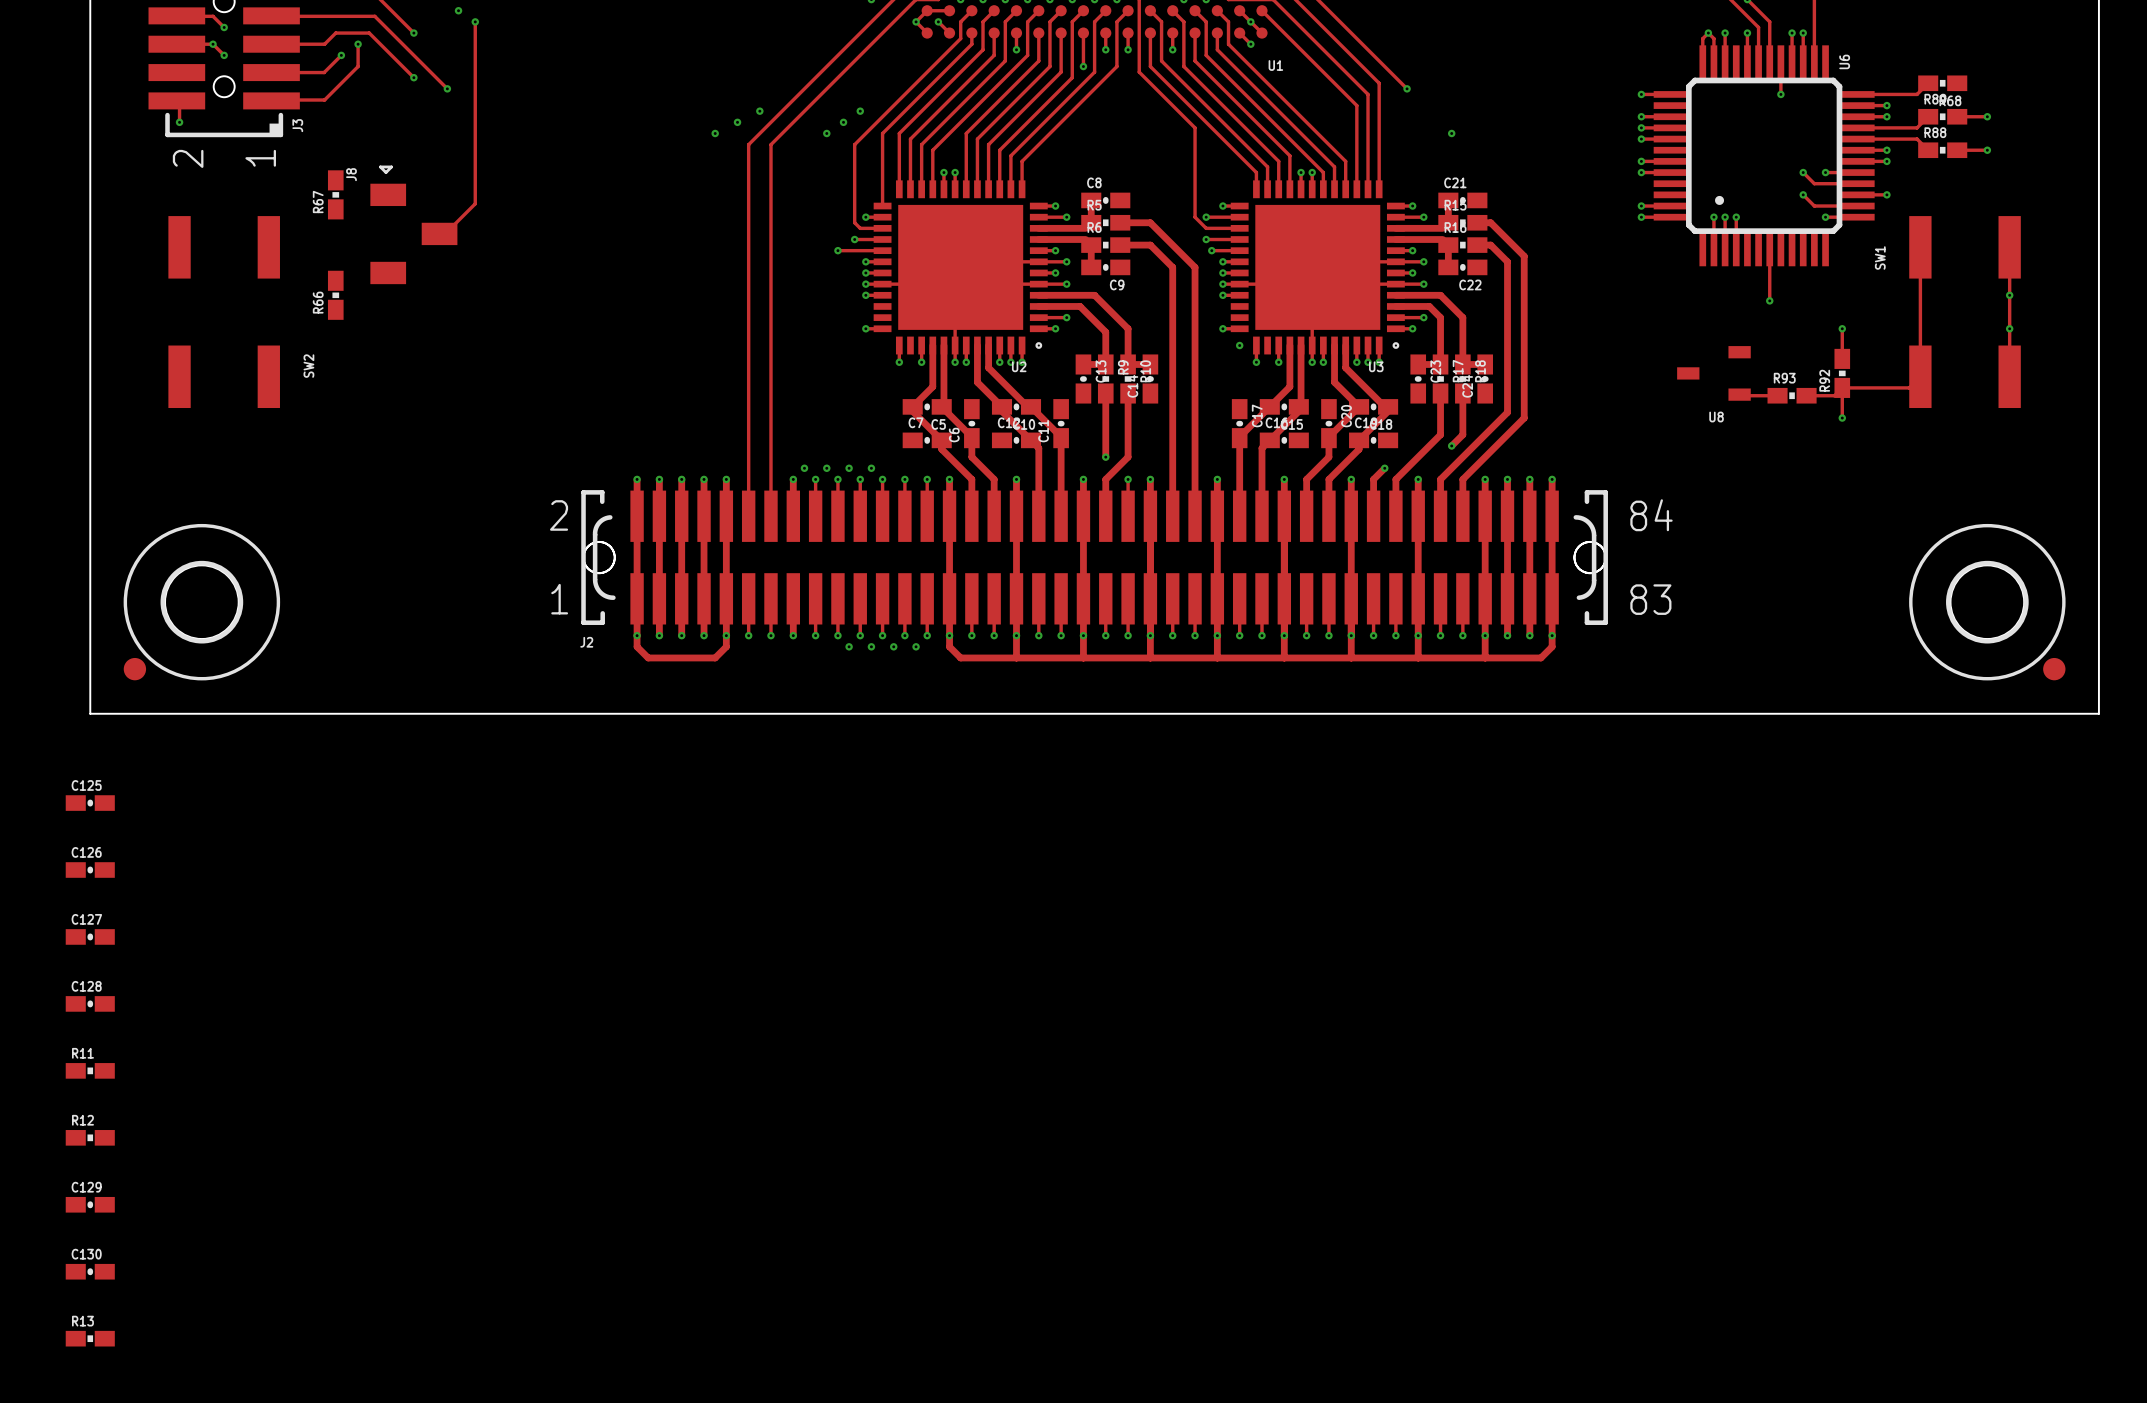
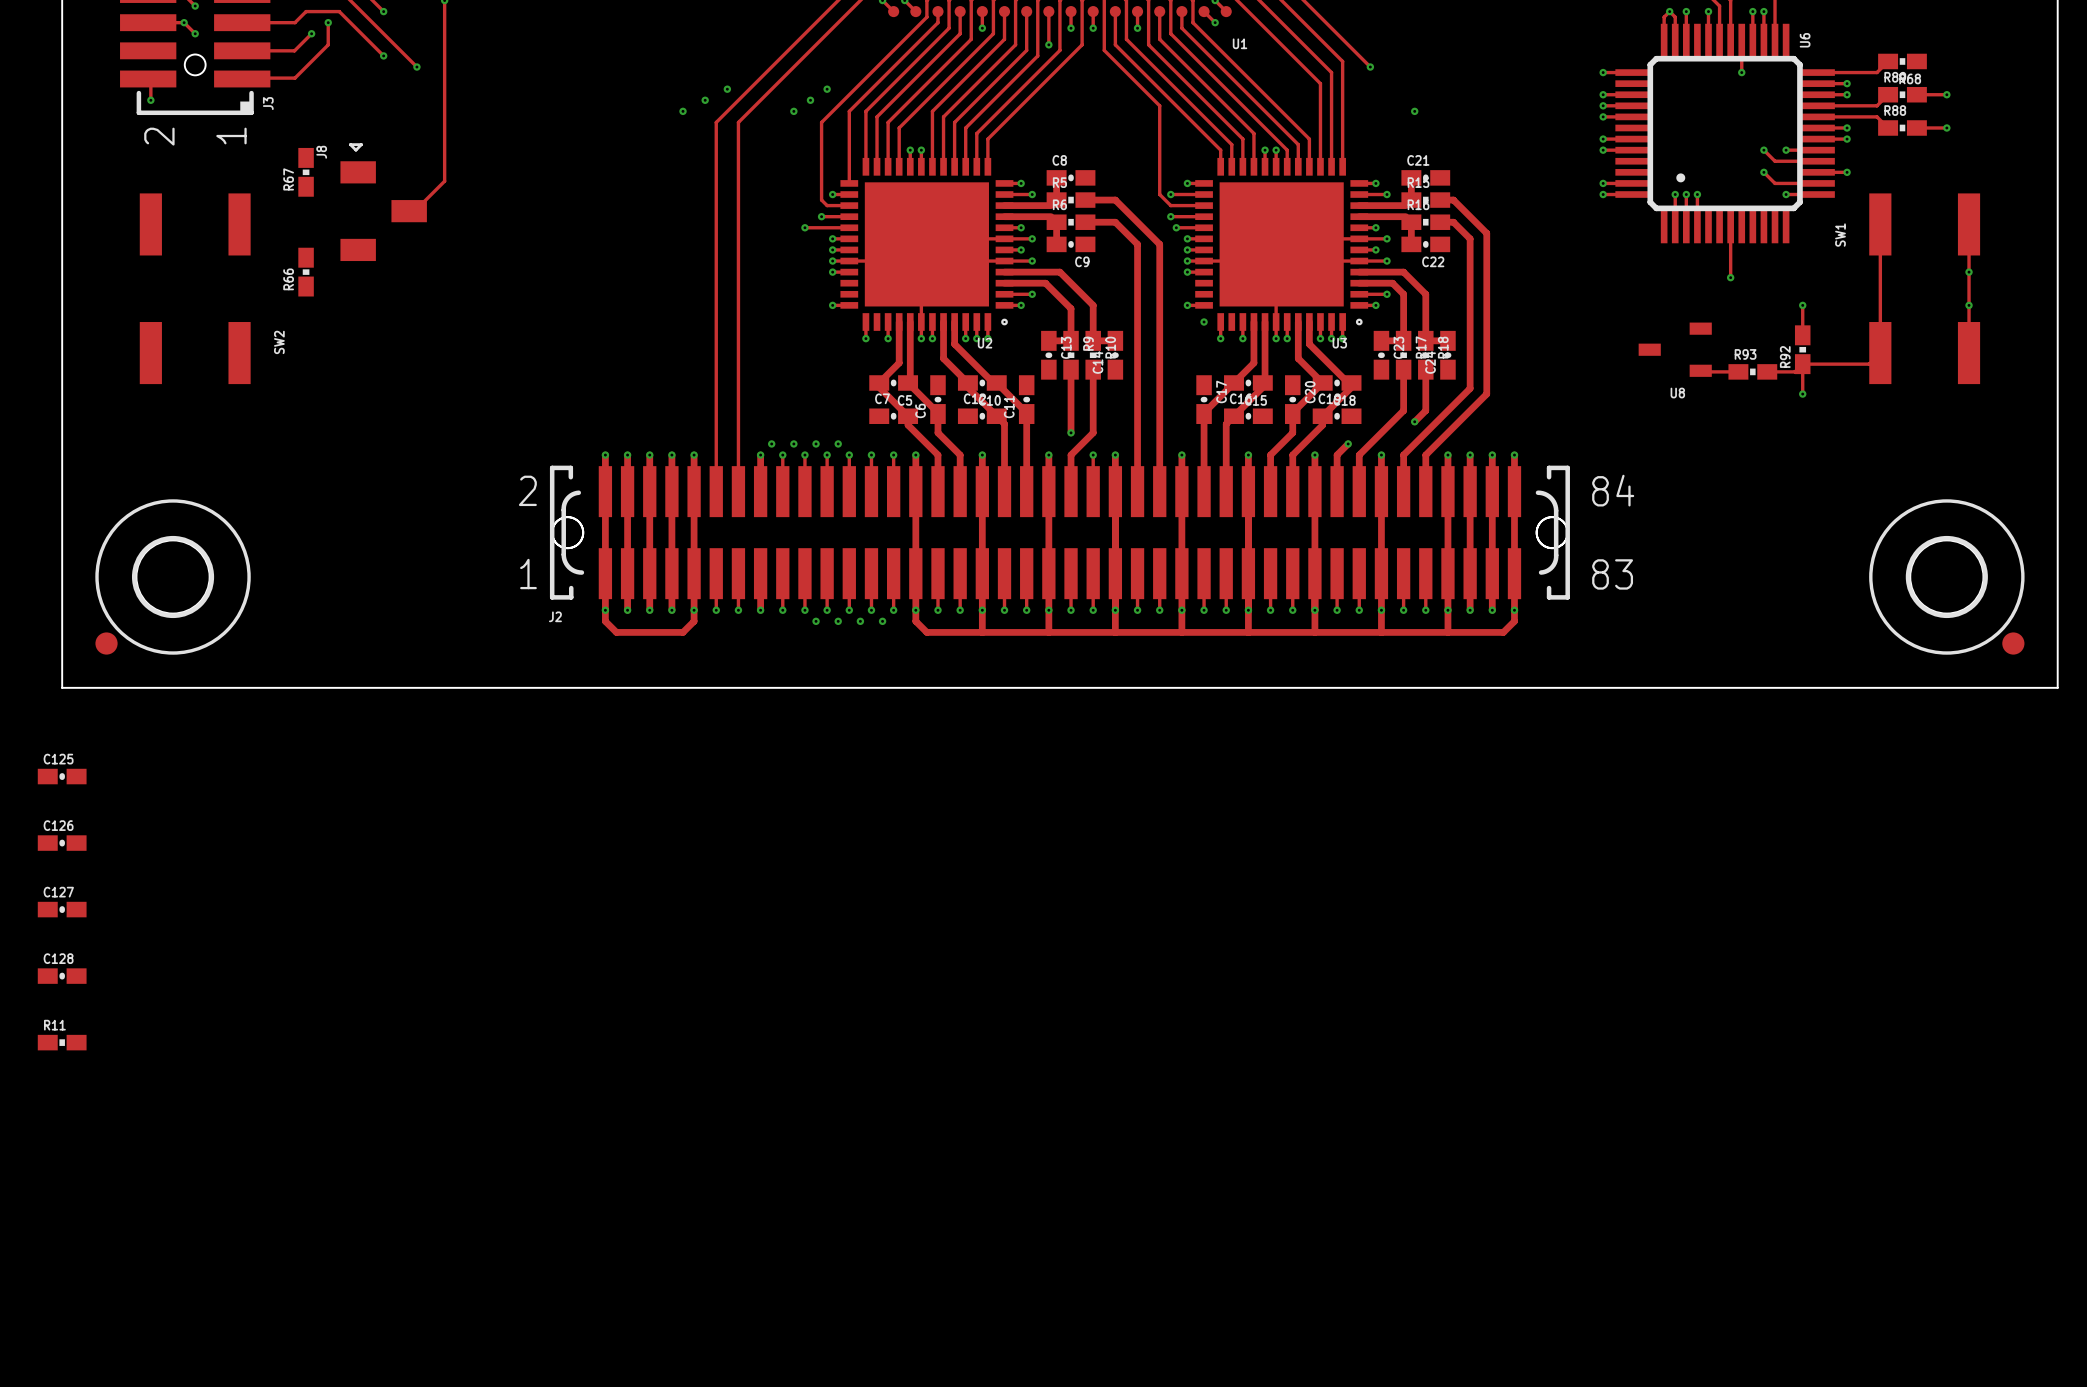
R12: (90, 1137) -> none
C129: (90, 1204) -> none
C130: (90, 1271) -> none
R13: (90, 1338) -> none

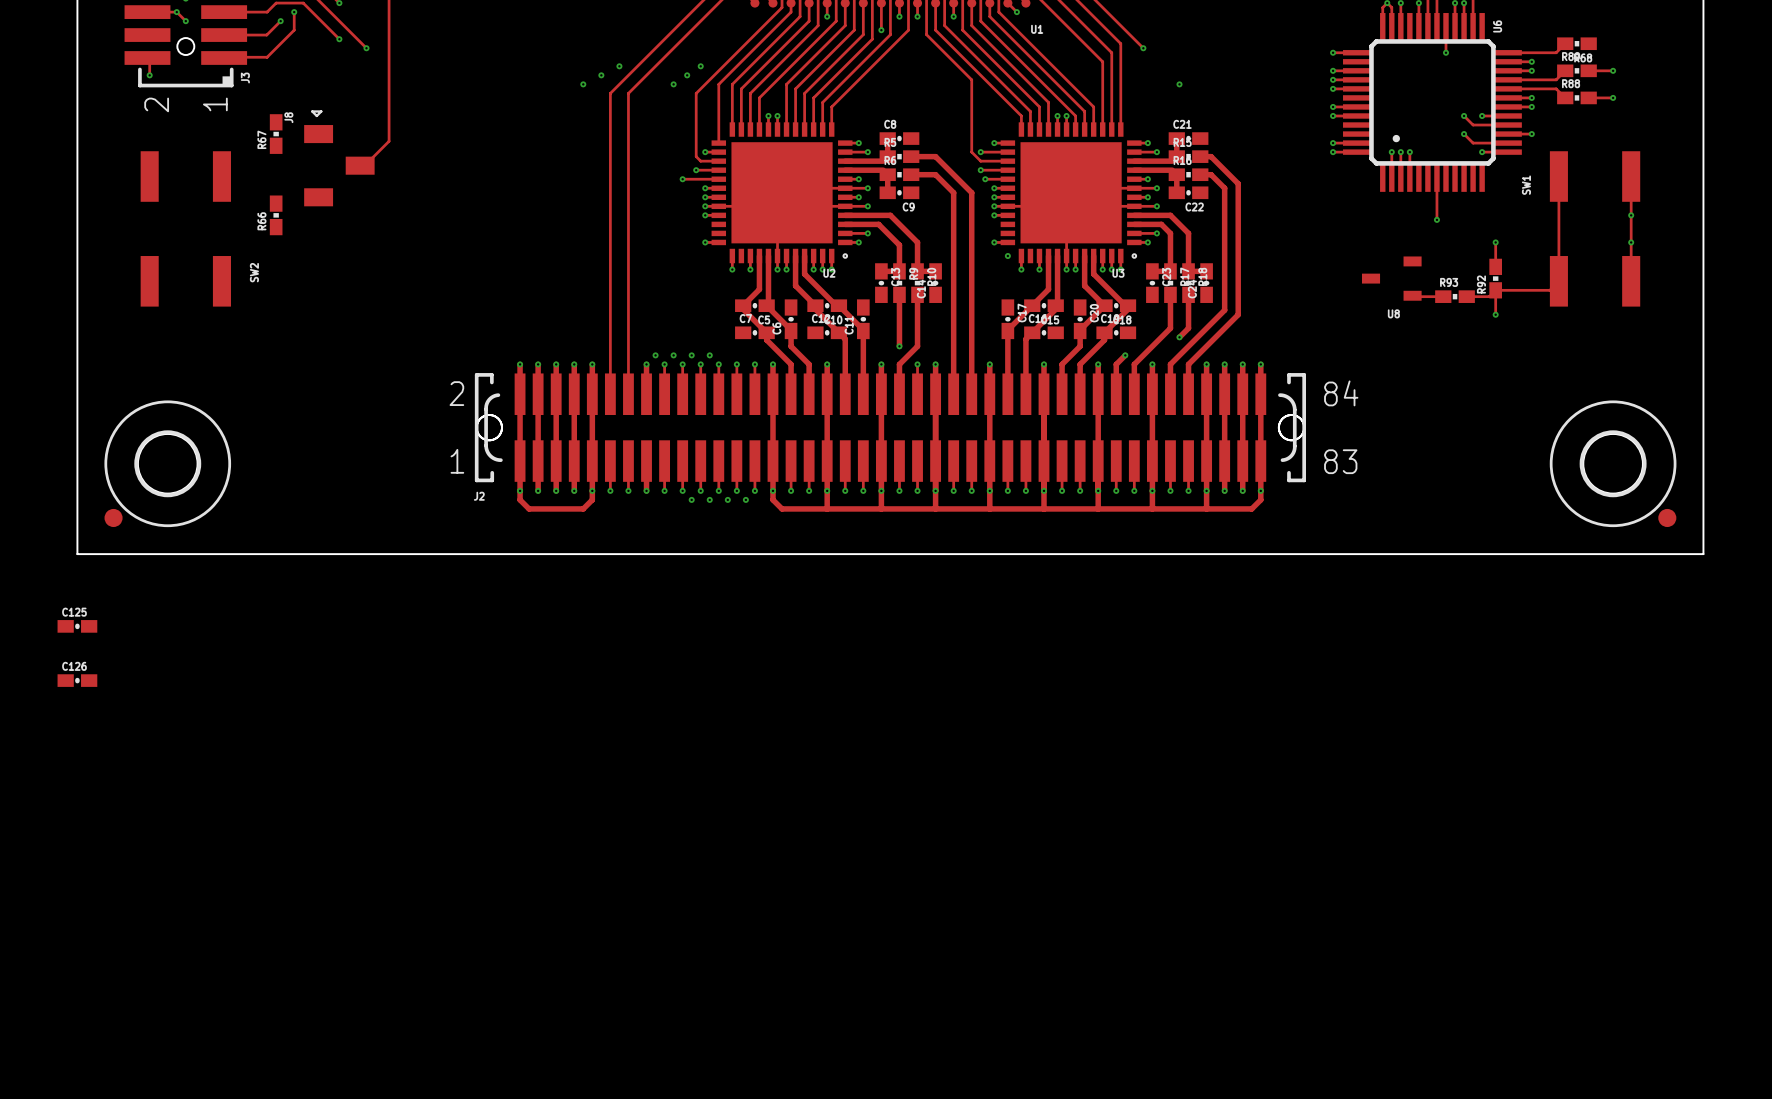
C127: (62, 909) -> none
C128: (62, 976) -> none
R11: (62, 1042) -> none

